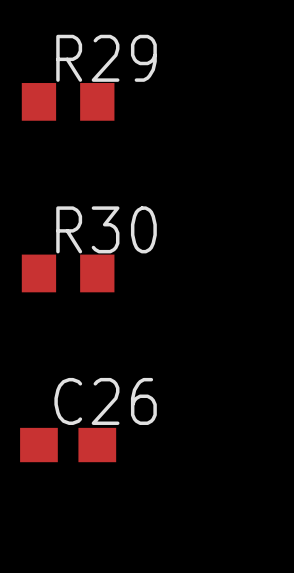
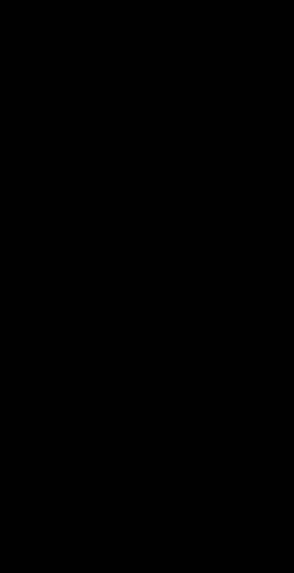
R29: (68, 101) -> none
R30: (68, 273) -> none
C26: (68, 445) -> none

